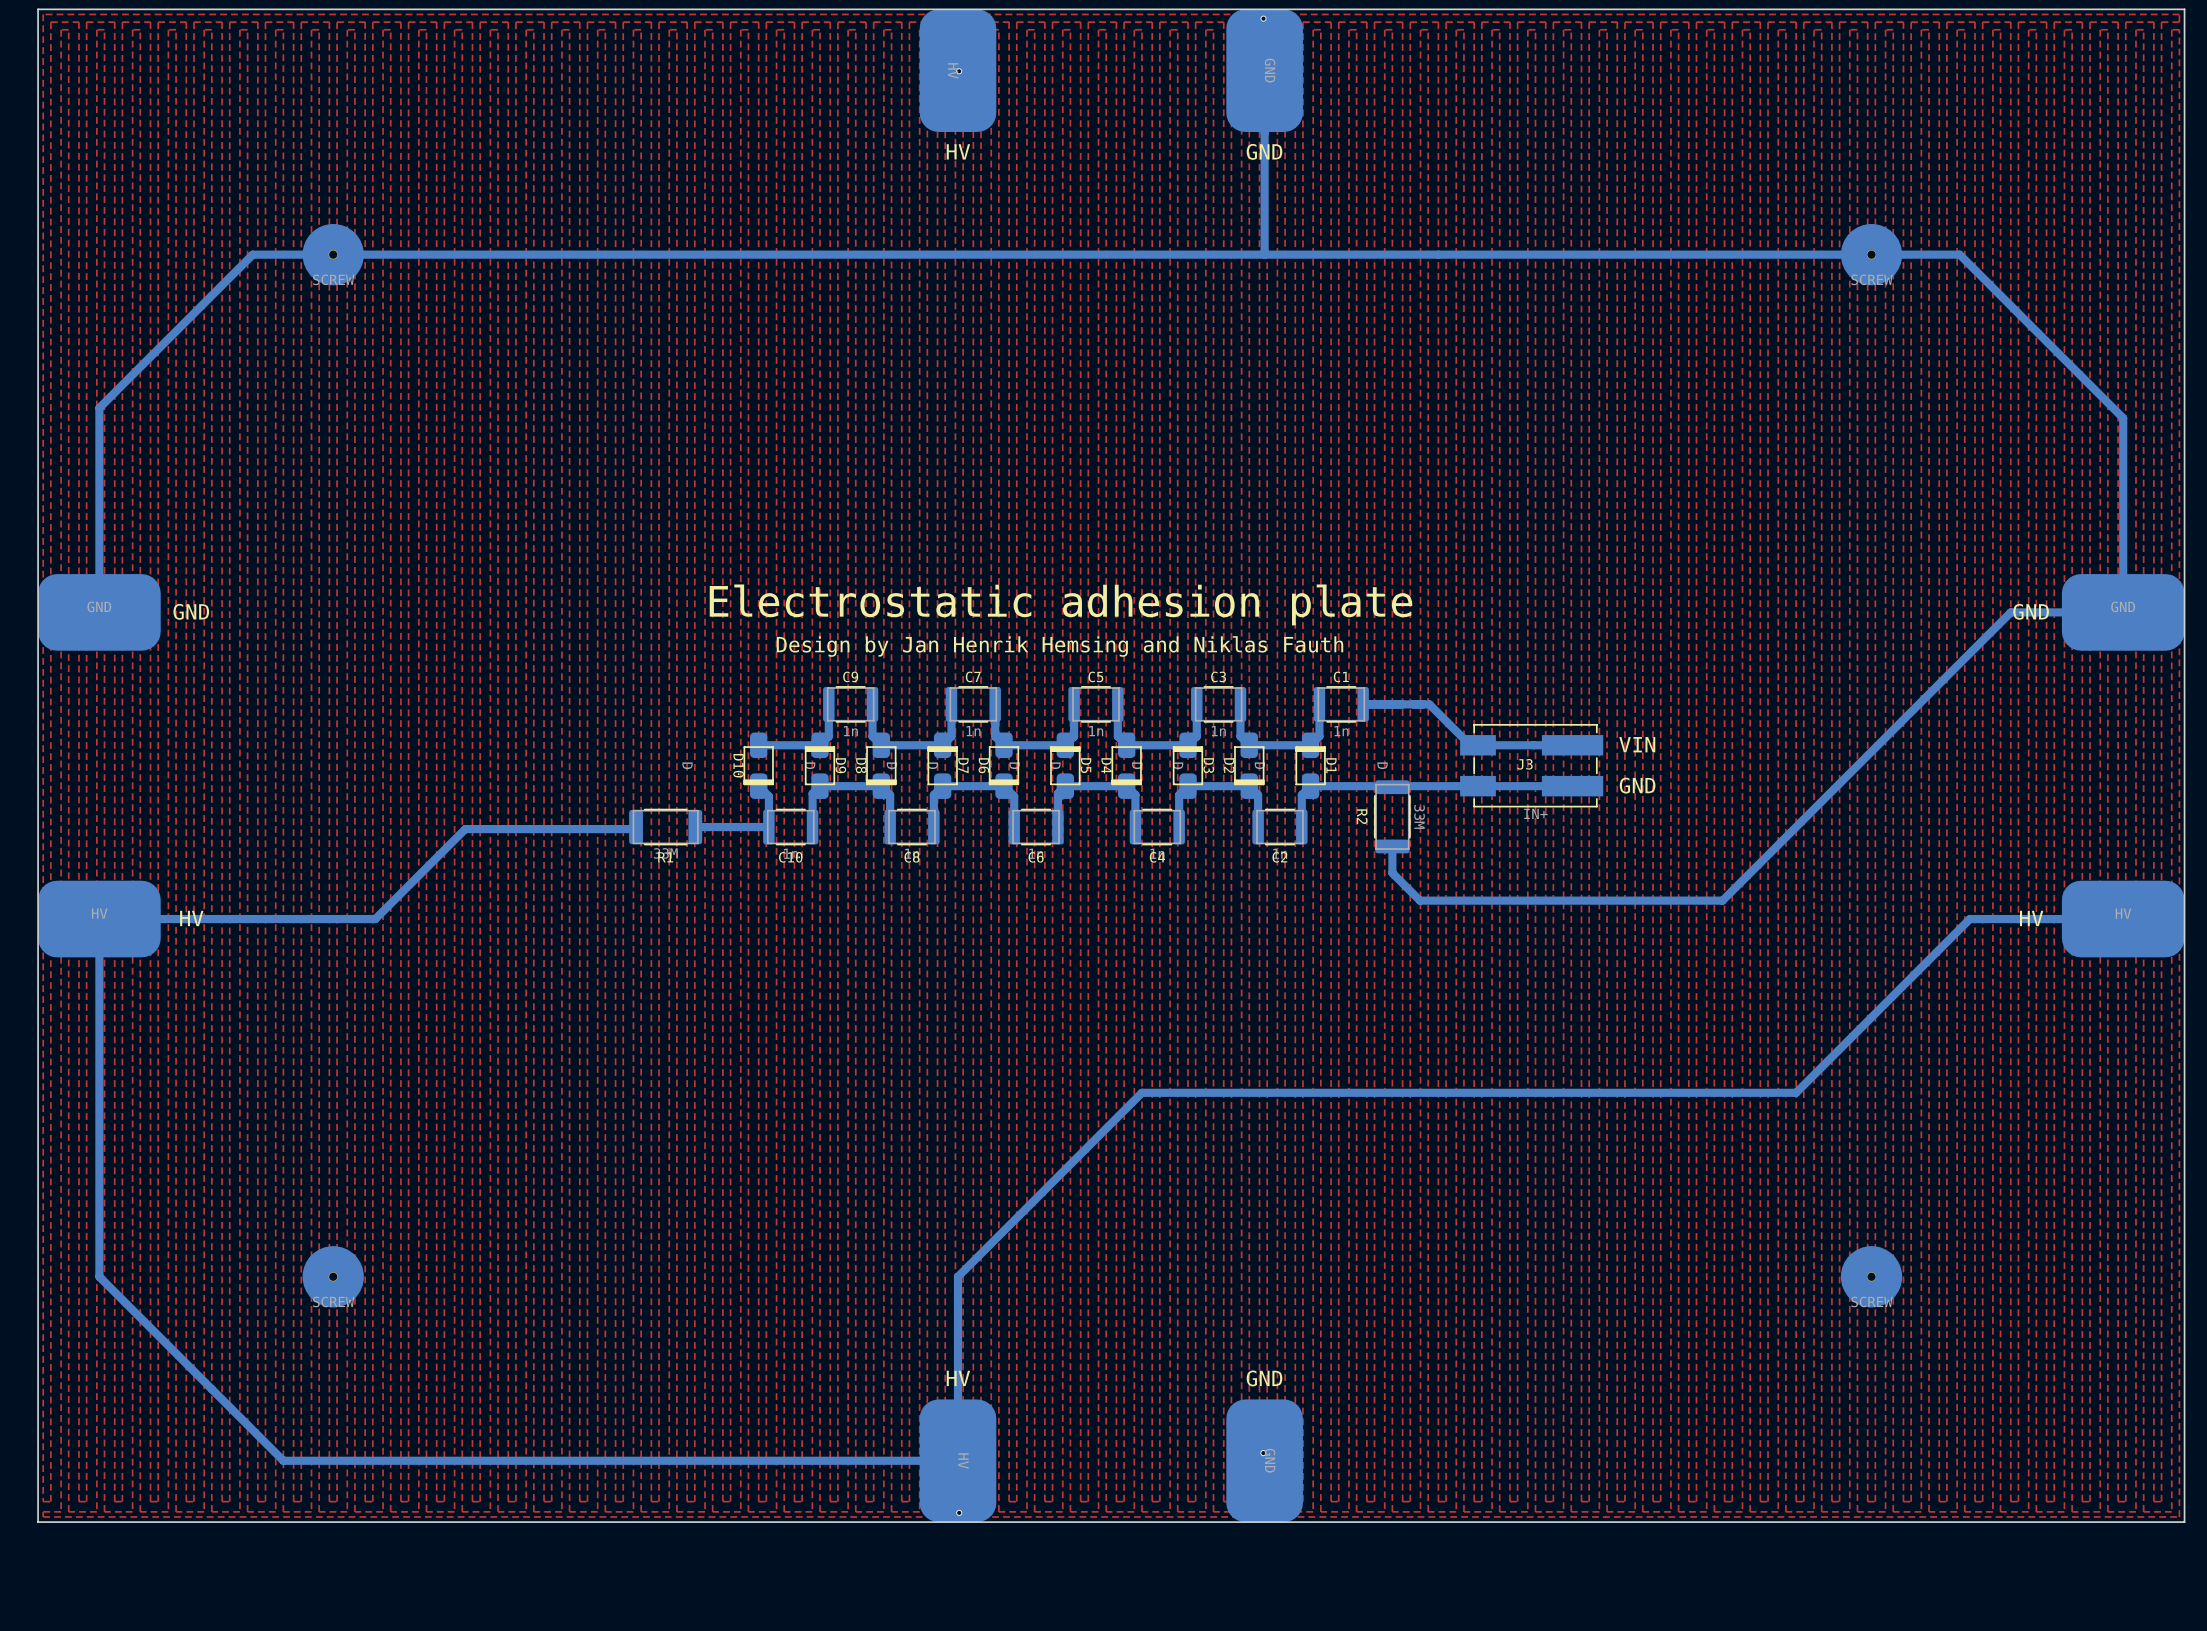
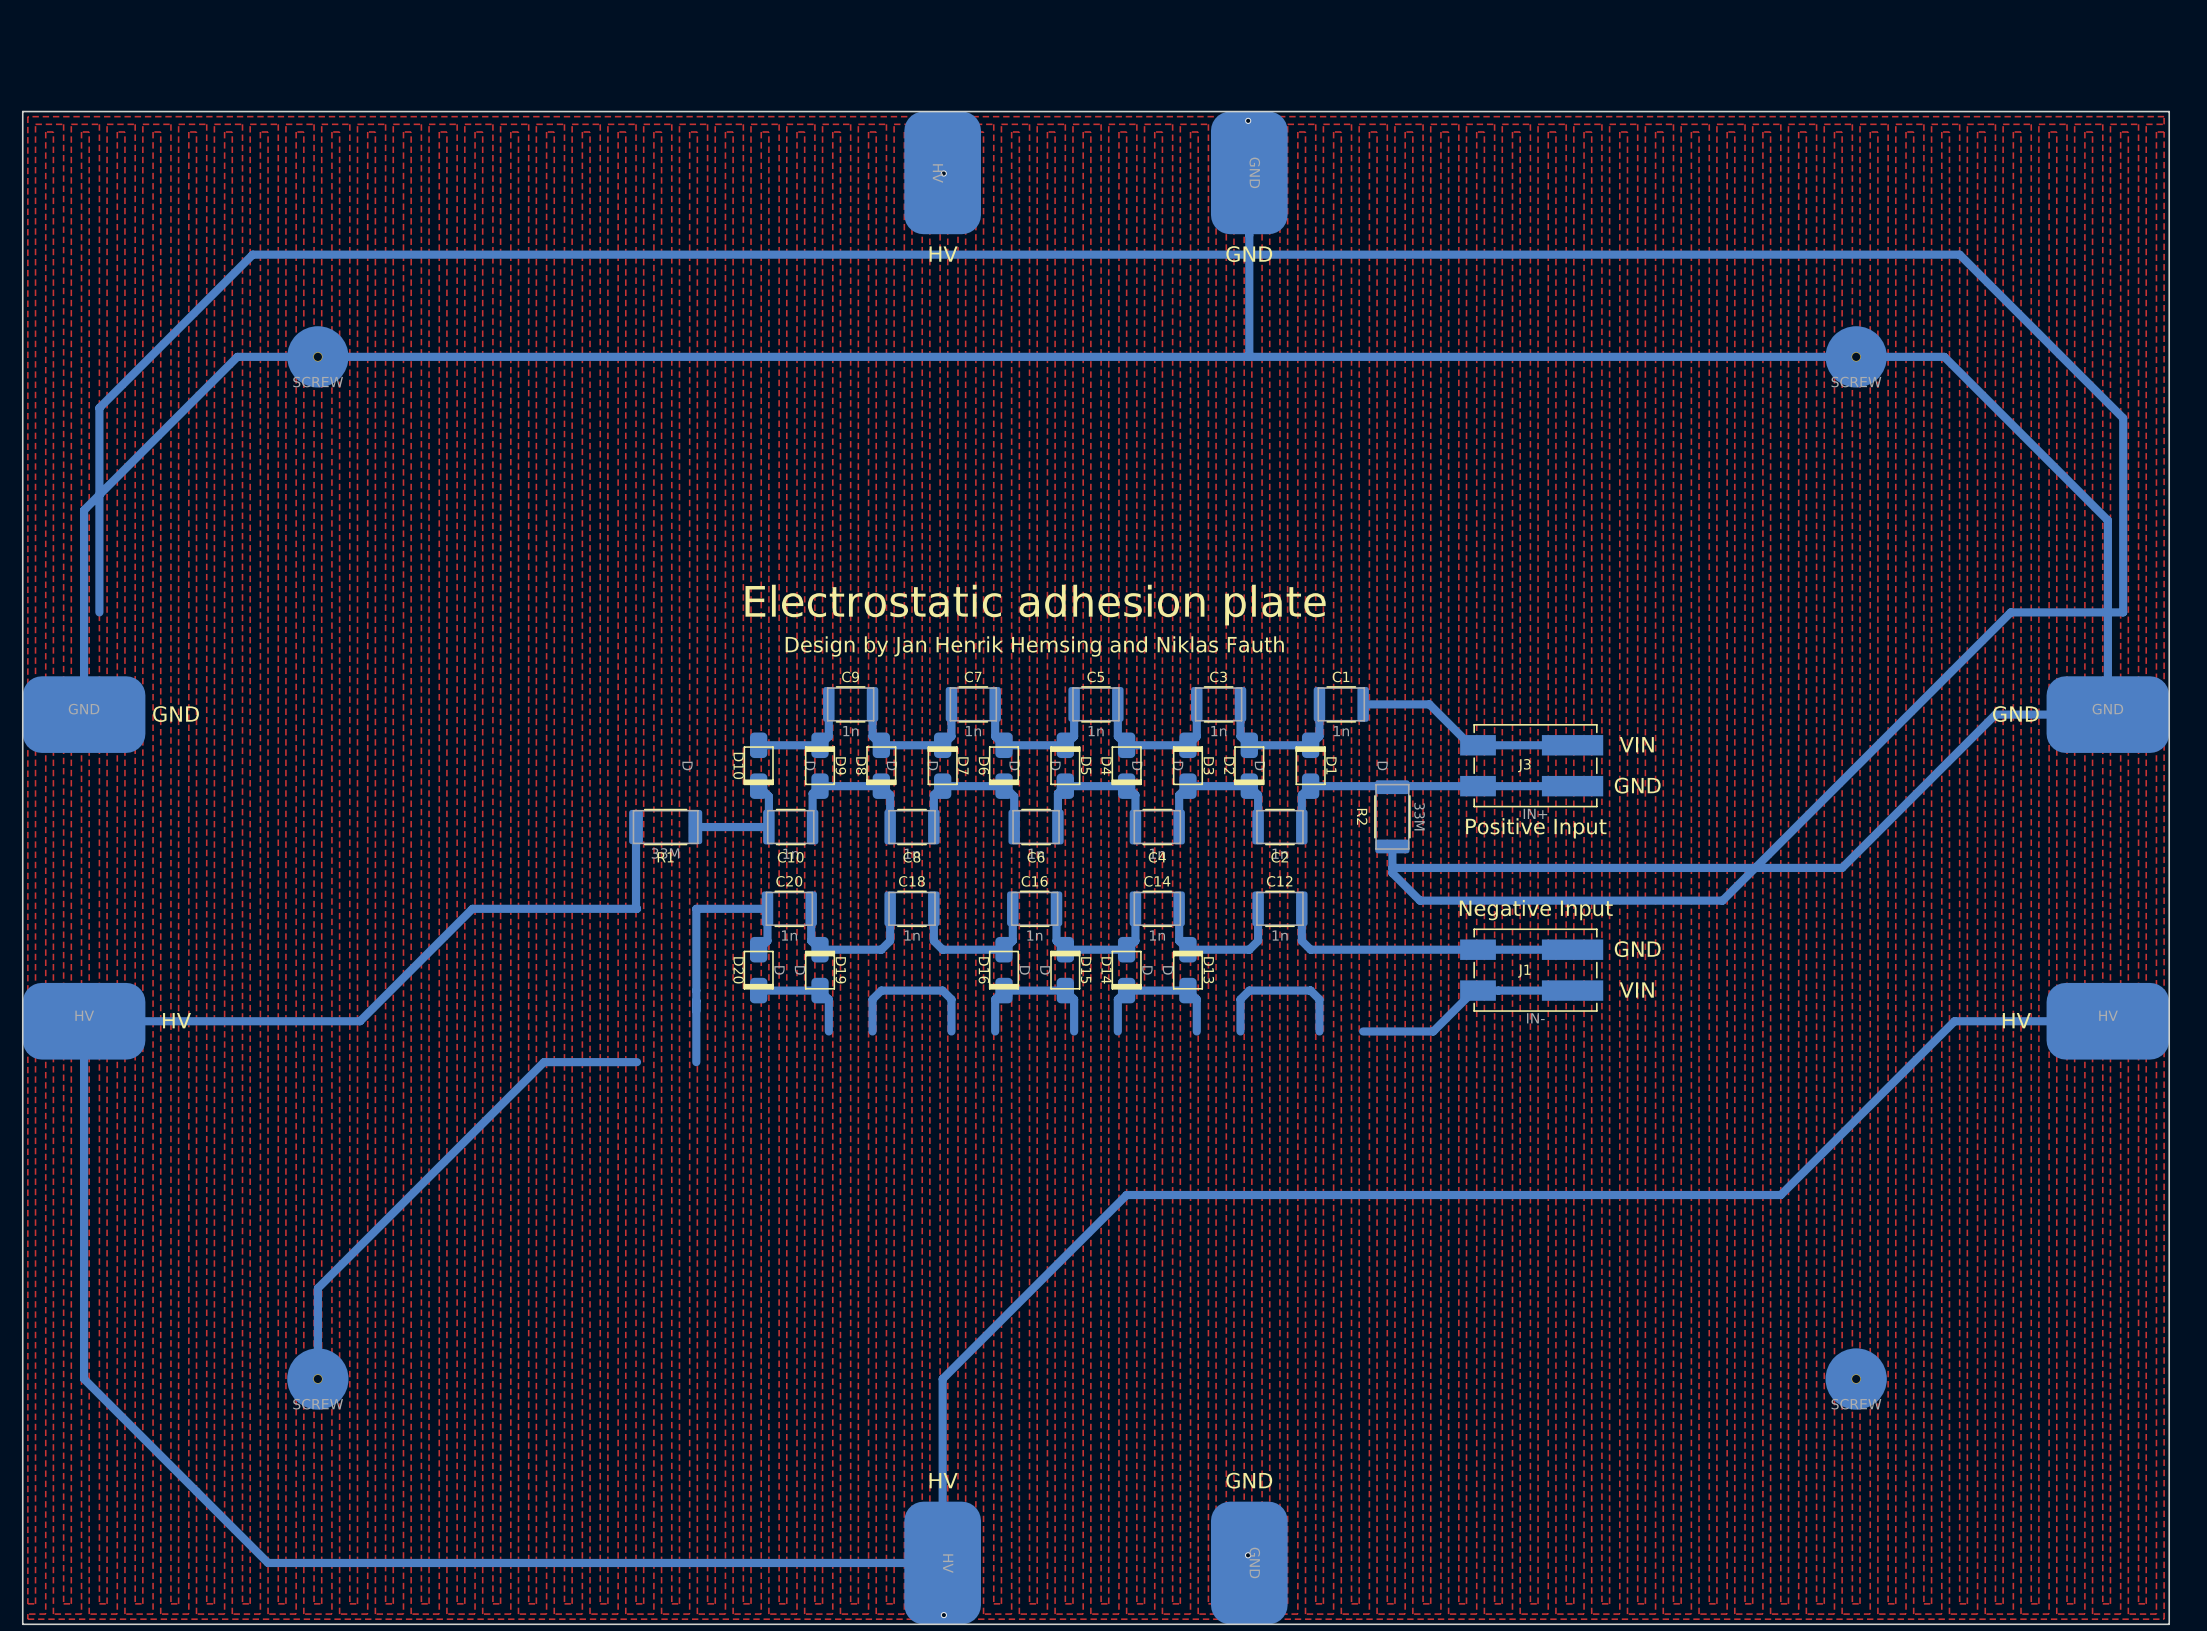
board edge: (2184, 9) (38, 9) (38, 1522) (2184, 1522) (2184, 9) -> (2169, 111) (22, 111) (22, 1624) (2169, 1624) (2169, 111)
top zone outline: (2179, 14) (2179, 22) (2161, 22) (2161, 1501) (2153, 1501) (2153, 22) (2125, 22) (2125, 1501) (2118, 1501) (2118, 22) (2090, 22) (2090, 1501) (2082, 1501) (2082, 22) (2054, 22) (2054, 1501) (2046, 1501) (2046, 22) (2018, 22) (2018, 1501) (2010, 1501) (2010, 22) (1982, 22) (1982, 1501) (1975, 1501) (1975, 22) (1946, 22) (1946, 1501) (1939, 1501) (1939, 22) (1911, 22) (1911, 1501) (1903, 1501) (1903, 22) (1875, 22) (1875, 1501) (1867, 1501) (1867, 22) (1839, 22) (1839, 1501) (1831, 1501) (1831, 22) (1803, 22) (1803, 1501) (1796, 1501) (1796, 22) (1768, 22) (1768, 1501) (1760, 1501) (1760, 22) (1732, 22) (1732, 1501) (1724, 1501) (1724, 22) (1696, 22) (1696, 1501) (1688, 1501) (1688, 22) (1660, 22) (1660, 1501) (1653, 1501) (1653, 22) (1624, 22) (1624, 1501) (1617, 1501) (1617, 22) (1589, 22) (1589, 1501) (1581, 1501) (1581, 22) (1553, 22) (1553, 1501) (1545, 1501) (1545, 22) (1517, 22) (1517, 1501) (1509, 1501) (1509, 22) (1481, 22) (1481, 1501) (1474, 1501) (1474, 22) (1446, 22) (1446, 1501) (1438, 1501) (1438, 22) (1410, 22) (1410, 1501) (1402, 1501) (1402, 22) (1374, 22) (1374, 1501) (1366, 1501) (1366, 22) (1338, 22) (1338, 1501) (1331, 1501) (1331, 22) (1302, 22) (1302, 1501) (1295, 1501) (1295, 22) (1267, 22) (1267, 1501) (1259, 1501) (1259, 22) (1231, 22) (1231, 1501) (1223, 1501) (1223, 22) (1195, 22) (1195, 1501) (1187, 1501) (1187, 22) (1159, 22) (1159, 1501) (1152, 1501) (1152, 22) (1124, 22) (1124, 1501) (1116, 1501) (1116, 22) (1088, 22) (1088, 1501) (1080, 1501) (1080, 22) (1052, 22) (1052, 1501) (1044, 1501) (1044, 22) (1016, 22) (1016, 1501) (1009, 1501) (1009, 22) (980, 22) (980, 1501) (973, 1501) (973, 22) (945, 22) (945, 1501) (937, 1501) (937, 22) (909, 22) (909, 1501) (901, 1501) (901, 22) (873, 22) (873, 1501) (866, 1501) (866, 22) (837, 22) (837, 1501) (830, 1501) (830, 22) (802, 22) (802, 1501) (794, 1501) (794, 22) (766, 22) (766, 1501) (758, 1501) (758, 22) (730, 22) (730, 1501) (722, 1501) (722, 22) (694, 22) (694, 1501) (687, 1501) (687, 22) (659, 22) (659, 1501) (651, 1501) (651, 22) (623, 22) (623, 1501) (615, 1501) (615, 22) (587, 22) (587, 1501) (579, 1501) (579, 22) (551, 22) (551, 1501) (544, 1501) (544, 22) (515, 22) (515, 1501) (508, 1501) (508, 22) (480, 22) (480, 1501) (472, 1501) (472, 22) (444, 22) (444, 1501) (436, 1501) (436, 22) (408, 22) (408, 1501) (400, 1501) (400, 22) (372, 22) (372, 1501) (365, 1501) (365, 22) (337, 22) (337, 1501) (329, 1501) (329, 22) (301, 22) (301, 1501) (293, 1501) (293, 22) (265, 22) (265, 1501) (257, 1501) (257, 22) (229, 22) (229, 1501) (222, 1501) (222, 22) (193, 22) (193, 1501) (186, 1501) (186, 22) (158, 22) (158, 1501) (150, 1501) (150, 22) (122, 22) (122, 1501) (114, 1501) (114, 22) (86, 22) (86, 1501) (78, 1501) (78, 22) (50, 22) (50, 1501) (43, 1501) (43, 14) (2179, 14) -> (2164, 116) (2164, 124) (2146, 124) (2146, 1603) (2138, 1603) (2138, 124) (2110, 124) (2110, 1603) (2102, 1603) (2102, 124) (2074, 124) (2074, 1603) (2067, 1603) (2067, 124) (2038, 124) (2038, 1603) (2031, 1603) (2031, 124) (2003, 124) (2003, 1603) (1995, 1603) (1995, 124) (1967, 124) (1967, 1603) (1959, 1603) (1959, 124) (1931, 124) (1931, 1603) (1923, 1603) (1923, 124) (1895, 124) (1895, 1603) (1888, 1603) (1888, 124) (1860, 124) (1860, 1603) (1852, 1603) (1852, 124) (1824, 124) (1824, 1603) (1816, 1603) (1816, 124) (1788, 124) (1788, 1603) (1780, 1603) (1780, 124) (1752, 124) (1752, 1603) (1745, 1603) (1745, 124) (1716, 124) (1716, 1603) (1709, 1603) (1709, 124) (1681, 124) (1681, 1603) (1673, 1603) (1673, 124) (1645, 124) (1645, 1603) (1637, 1603) (1637, 124) (1609, 124) (1609, 1603) (1601, 1603) (1601, 124) (1573, 124) (1573, 1603) (1566, 1603) (1566, 124) (1538, 124) (1538, 1603) (1530, 1603) (1530, 124) (1502, 124) (1502, 1603) (1494, 1603) (1494, 124) (1466, 124) (1466, 1603) (1458, 1603) (1458, 124) (1430, 124) (1430, 1603) (1423, 1603) (1423, 124) (1394, 124) (1394, 1603) (1387, 1603) (1387, 124) (1359, 124) (1359, 1603) (1351, 1603) (1351, 124) (1323, 124) (1323, 1603) (1315, 1603) (1315, 124) (1287, 124) (1287, 1603) (1279, 1603) (1279, 124) (1251, 124) (1251, 1603) (1244, 1603) (1244, 124) (1216, 124) (1216, 1603) (1208, 1603) (1208, 124) (1180, 124) (1180, 1603) (1172, 1603) (1172, 124) (1144, 124) (1144, 1603) (1136, 1603) (1136, 124) (1108, 124) (1108, 1603) (1101, 1603) (1101, 124) (1072, 124) (1072, 1603) (1065, 1603) (1065, 124) (1037, 124) (1037, 1603) (1029, 1603) (1029, 124) (1001, 124) (1001, 1603) (993, 1603) (993, 124) (965, 124) (965, 1603) (957, 1603) (957, 124) (929, 124) (929, 1603) (922, 1603) (922, 124) (894, 124) (894, 1603) (886, 1603) (886, 124) (858, 124) (858, 1603) (850, 1603) (850, 124) (822, 124) (822, 1603) (814, 1603) (814, 124) (786, 124) (786, 1603) (779, 1603) (779, 124) (751, 124) (751, 1603) (743, 1603) (743, 124) (715, 124) (715, 1603) (707, 1603) (707, 124) (679, 124) (679, 1603) (671, 1603) (671, 124) (643, 124) (643, 1603) (636, 1603) (636, 124) (607, 124) (607, 1603) (600, 1603) (600, 124) (572, 124) (572, 1603) (564, 1603) (564, 124) (536, 124) (536, 1603) (528, 1603) (528, 124) (500, 124) (500, 1603) (492, 1603) (492, 124) (464, 124) (464, 1603) (457, 1603) (457, 124) (429, 124) (429, 1603) (421, 1603) (421, 124) (393, 124) (393, 1603) (385, 1603) (385, 124) (357, 124) (357, 1603) (349, 1603) (349, 124) (321, 124) (321, 1603) (314, 1603) (314, 124) (285, 124) (285, 1603) (278, 1603) (278, 124) (250, 124) (250, 1603) (242, 1603) (242, 124) (214, 124) (214, 1603) (206, 1603) (206, 124) (178, 124) (178, 1603) (170, 1603) (170, 124) (142, 124) (142, 1603) (135, 1603) (135, 124) (107, 124) (107, 1603) (99, 1603) (99, 124) (71, 124) (71, 1603) (63, 1603) (63, 124) (35, 124) (35, 1603) (27, 1603) (27, 116) (2164, 116)
via: (1263, 18) -> none
top zone outline: (2179, 29) (2179, 1516) (43, 1516) (43, 1511) (61, 1511) (61, 29) (68, 29) (68, 1511) (96, 1511) (96, 29) (104, 29) (104, 1511) (132, 1511) (132, 29) (140, 29) (140, 1511) (168, 1511) (168, 29) (176, 29) (176, 1511) (204, 1511) (204, 29) (211, 29) (211, 1511) (239, 1511) (239, 29) (247, 29) (247, 1511) (275, 1511) (275, 29) (283, 29) (283, 1511) (311, 1511) (311, 29) (319, 29) (319, 1511) (347, 1511) (347, 29) (354, 29) (354, 1511) (383, 1511) (383, 29) (390, 29) (390, 1511) (418, 1511) (418, 29) (426, 29) (426, 1511) (454, 1511) (454, 29) (462, 29) (462, 1511) (490, 1511) (490, 29) (498, 29) (498, 1511) (526, 1511) (526, 29) (533, 29) (533, 1511) (561, 1511) (561, 29) (569, 29) (569, 1511) (597, 1511) (597, 29) (605, 29) (605, 1511) (633, 1511) (633, 29) (641, 29) (641, 1511) (669, 1511) (669, 29) (676, 29) (676, 1511) (705, 1511) (705, 29) (712, 29) (712, 1511) (740, 1511) (740, 29) (748, 29) (748, 1511) (776, 1511) (776, 29) (784, 29) (784, 1511) (812, 1511) (812, 29) (820, 29) (820, 1511) (848, 1511) (848, 29) (855, 29) (855, 1511) (883, 1511) (883, 29) (891, 29) (891, 1511) (919, 1511) (919, 29) (927, 29) (927, 1511) (955, 1511) (955, 29) (963, 29) (963, 1511) (991, 1511) (991, 29) (998, 29) (998, 1511) (1026, 1511) (1026, 29) (1034, 29) (1034, 1511) (1062, 1511) (1062, 29) (1070, 29) (1070, 1511) (1098, 1511) (1098, 29) (1106, 29) (1106, 1511) (1134, 1511) (1134, 29) (1141, 29) (1141, 1511) (1170, 1511) (1170, 29) (1177, 29) (1177, 1511) (1205, 1511) (1205, 29) (1213, 29) (1213, 1511) (1241, 1511) (1241, 29) (1249, 29) (1249, 1511) (1277, 1511) (1277, 29) (1285, 29) (1285, 1511) (1313, 1511) (1313, 29) (1320, 29) (1320, 1511) (1348, 1511) (1348, 29) (1356, 29) (1356, 1511) (1384, 1511) (1384, 29) (1392, 29) (1392, 1511) (1420, 1511) (1420, 29) (1428, 29) (1428, 1511) (1456, 1511) (1456, 29) (1463, 29) (1463, 1511) (1492, 1511) (1492, 29) (1499, 29) (1499, 1511) (1527, 1511) (1527, 29) (1535, 29) (1535, 1511) (1563, 1511) (1563, 29) (1571, 29) (1571, 1511) (1599, 1511) (1599, 29) (1607, 29) (1607, 1511) (1635, 1511) (1635, 29) (1642, 29) (1642, 1511) (1670, 1511) (1670, 29) (1678, 29) (1678, 1511) (1706, 1511) (1706, 29) (1714, 29) (1714, 1511) (1742, 1511) (1742, 29) (1750, 29) (1750, 1511) (1778, 1511) (1778, 29) (1785, 29) (1785, 1511) (1814, 1511) (1814, 29) (1821, 29) (1821, 1511) (1849, 1511) (1849, 29) (1857, 29) (1857, 1511) (1885, 1511) (1885, 29) (1893, 29) (1893, 1511) (1921, 1511) (1921, 29) (1929, 29) (1929, 1511) (1957, 1511) (1957, 29) (1964, 29) (1964, 1511) (1992, 1511) (1992, 29) (2000, 29) (2000, 1511) (2028, 1511) (2028, 29) (2036, 29) (2036, 1511) (2064, 1511) (2064, 29) (2072, 29) (2072, 1511) (2100, 1511) (2100, 29) (2107, 29) (2107, 1511) (2135, 1511) (2135, 29) (2143, 29) (2143, 1511) (2171, 1511) (2171, 29) (2179, 29) -> (2164, 131) (2164, 1619) (27, 1619) (27, 1614) (45, 1614) (45, 131) (53, 131) (53, 1614) (81, 1614) (81, 131) (89, 131) (89, 1614) (117, 1614) (117, 131) (124, 131) (124, 1614) (153, 1614) (153, 131) (160, 131) (160, 1614) (188, 1614) (188, 131) (196, 131) (196, 1614) (224, 1614) (224, 131) (232, 131) (232, 1614) (260, 1614) (260, 131) (268, 131) (268, 1614) (296, 1614) (296, 131) (303, 131) (303, 1614) (331, 1614) (331, 131) (339, 131) (339, 1614) (367, 1614) (367, 131) (375, 131) (375, 1614) (403, 1614) (403, 131) (411, 131) (411, 1614) (439, 1614) (439, 131) (446, 131) (446, 1614) (475, 1614) (475, 131) (482, 131) (482, 1614) (510, 1614) (510, 131) (518, 131) (518, 1614) (546, 1614) (546, 131) (554, 131) (554, 1614) (582, 1614) (582, 131) (590, 131) (590, 1614) (618, 1614) (618, 131) (625, 131) (625, 1614) (653, 1614) (653, 131) (661, 131) (661, 1614) (689, 1614) (689, 131) (697, 131) (697, 1614) (725, 1614) (725, 131) (733, 131) (733, 1614) (761, 1614) (761, 131) (768, 131) (768, 1614) (797, 1614) (797, 131) (804, 131) (804, 1614) (832, 1614) (832, 131) (840, 131) (840, 1614) (868, 1614) (868, 131) (876, 131) (876, 1614) (904, 1614) (904, 131) (911, 131) (911, 1614) (940, 1614) (940, 131) (947, 131) (947, 1614) (975, 1614) (975, 131) (983, 131) (983, 1614) (1011, 1614) (1011, 131) (1019, 131) (1019, 1614) (1047, 1614) (1047, 131) (1055, 131) (1055, 1614) (1083, 1614) (1083, 131) (1090, 131) (1090, 1614) (1118, 1614) (1118, 131) (1126, 131) (1126, 1614) (1154, 1614) (1154, 131) (1162, 131) (1162, 1614) (1190, 1614) (1190, 131) (1198, 131) (1198, 1614) (1226, 1614) (1226, 131) (1233, 131) (1233, 1614) (1262, 1614) (1262, 131) (1269, 131) (1269, 1614) (1297, 1614) (1297, 131) (1305, 131) (1305, 1614) (1333, 1614) (1333, 131) (1341, 131) (1341, 1614) (1369, 1614) (1369, 131) (1377, 131) (1377, 1614) (1405, 1614) (1405, 131) (1412, 131) (1412, 1614) (1440, 1614) (1440, 131) (1448, 131) (1448, 1614) (1476, 1614) (1476, 131) (1484, 131) (1484, 1614) (1512, 1614) (1512, 131) (1520, 131) (1520, 1614) (1548, 1614) (1548, 131) (1555, 131) (1555, 1614) (1584, 1614) (1584, 131) (1591, 131) (1591, 1614) (1619, 1614) (1619, 131) (1627, 131) (1627, 1614) (1655, 1614) (1655, 131) (1663, 131) (1663, 1614) (1691, 1614) (1691, 131) (1699, 131) (1699, 1614) (1727, 1614) (1727, 131) (1734, 131) (1734, 1614) (1762, 1614) (1762, 131) (1770, 131) (1770, 1614) (1798, 1614) (1798, 131) (1806, 131) (1806, 1614) (1834, 1614) (1834, 131) (1842, 131) (1842, 1614) (1870, 1614) (1870, 131) (1877, 131) (1877, 1614) (1906, 1614) (1906, 131) (1913, 131) (1913, 1614) (1941, 1614) (1941, 131) (1949, 131) (1949, 1614) (1977, 1614) (1977, 131) (1985, 131) (1985, 1614) (2013, 1614) (2013, 131) (2021, 131) (2021, 1614) (2049, 1614) (2049, 131) (2056, 131) (2056, 1614) (2084, 1614) (2084, 131) (2092, 131) (2092, 1614) (2120, 1614) (2120, 131) (2128, 131) (2128, 1614) (2156, 1614) (2156, 131) (2164, 131)
part position: (957, 70) -> (942, 172)
bottom track: (1264, 70) (1264, 254) -> (1249, 172) (1249, 356)
part position: (1264, 70) -> (1249, 172)
via: (959, 71) -> none
via: none -> (1248, 120)
text position: HV (958, 151) -> HV (943, 254)
text position: GND (1264, 151) -> GND (1249, 254)
via: none -> (943, 173)
part position: (333, 254) -> (317, 356)
part position: (1871, 254) -> (1856, 356)
text position: Electrostatic adhesion plate (1060, 604) -> Electrostatic adhesion plate (1035, 605)
text position: GND (191, 611) -> GND (176, 714)
text position: GND (2031, 611) -> GND (2015, 714)
part position: (99, 612) -> (84, 714)
part position: (2123, 612) -> (2107, 714)
text position: Design by Jan Henrik Hemsing and Niklas Fauth (1059, 646) -> Design by Jan Henrik Hemsing and Niklas Fauth (1034, 646)
bottom track: none -> (84, 714) (84, 510) (237, 356) (1944, 356) (2107, 520) (2107, 714) (1995, 714) (1842, 867) (1392, 867)
bottom track: (636, 827) (633, 829) (465, 829) (375, 919) (99, 919) -> (636, 827) (637, 908) (472, 908) (360, 1021) (84, 1021)
text: none -> Positive Input (1536, 828)
C20: none -> 1n (789, 908)
bottom track: none -> (890, 908) (890, 940) (881, 949) (820, 949) (811, 940) (811, 908)
C18: none -> 1n (911, 908)
bottom track: none -> (1012, 908) (1012, 940) (1003, 949) (942, 949) (933, 940) (933, 908)
C16: none -> 1n (1034, 908)
bottom track: none -> (1135, 908) (1135, 940) (1126, 949) (1065, 949) (1056, 940) (1056, 908)
C14: none -> 1n (1157, 908)
bottom track: none -> (1258, 908) (1258, 940) (1249, 949) (1187, 949) (1179, 940) (1179, 908)
C12: none -> 1n (1279, 908)
bottom track: none -> (1301, 908) (1301, 940) (1310, 949) (1592, 949)
text: none -> Negative Input (1536, 910)
text position: HV (191, 918) -> HV (177, 1020)
text position: HV (2031, 918) -> HV (2016, 1020)
part position: (99, 919) -> (84, 1021)
bottom track: (2123, 919) (1969, 919) (1796, 1092) (1141, 1092) (957, 1276) (957, 1460) (283, 1460) (99, 1276) (99, 919) -> (2107, 1021) (1954, 1021) (1780, 1195) (1126, 1195) (942, 1378) (942, 1562) (268, 1562) (84, 1378) (84, 1021)
part position: (2123, 919) -> (2107, 1021)
bottom track: none -> (758, 949) (767, 940) (767, 908) (696, 908) (696, 1062)
text: none -> GND (1637, 949)
D20: none -> D (758, 970)
D19: none -> D (820, 970)
D16: none -> D (1003, 970)
D15: none -> D (1065, 970)
D14: none -> D (1126, 970)
D13: none -> D (1187, 970)
J1: none -> IN- (1531, 970)
bottom track: none -> (758, 990) (820, 990) (828, 999) (828, 1031)
bottom track: none -> (1592, 990) (1474, 990) (1433, 1031) (1363, 1031)
text: none -> VIN (1636, 990)
bottom track: none -> (951, 1031) (951, 999) (942, 990) (881, 990) (872, 999) (872, 1031)
bottom track: none -> (1074, 1031) (1074, 999) (1065, 990) (1003, 990) (995, 999) (995, 1031)
bottom track: none -> (1196, 1031) (1196, 999) (1187, 990) (1126, 990) (1117, 999) (1117, 1031)
bottom track: none -> (1319, 1031) (1319, 999) (1310, 990) (1249, 990) (1240, 999) (1240, 1031)
bottom track: none -> (637, 1062) (544, 1062) (317, 1288) (317, 1378)
part position: (333, 1276) -> (317, 1378)
part position: (1871, 1276) -> (1856, 1378)
text position: HV (958, 1378) -> HV (943, 1480)
text position: GND (1264, 1378) -> GND (1249, 1480)
via: (1263, 1453) -> none
part position: (957, 1460) -> (942, 1562)
part position: (1264, 1460) -> (1249, 1562)
via: (959, 1512) -> none
via: none -> (1248, 1555)
via: none -> (943, 1615)

